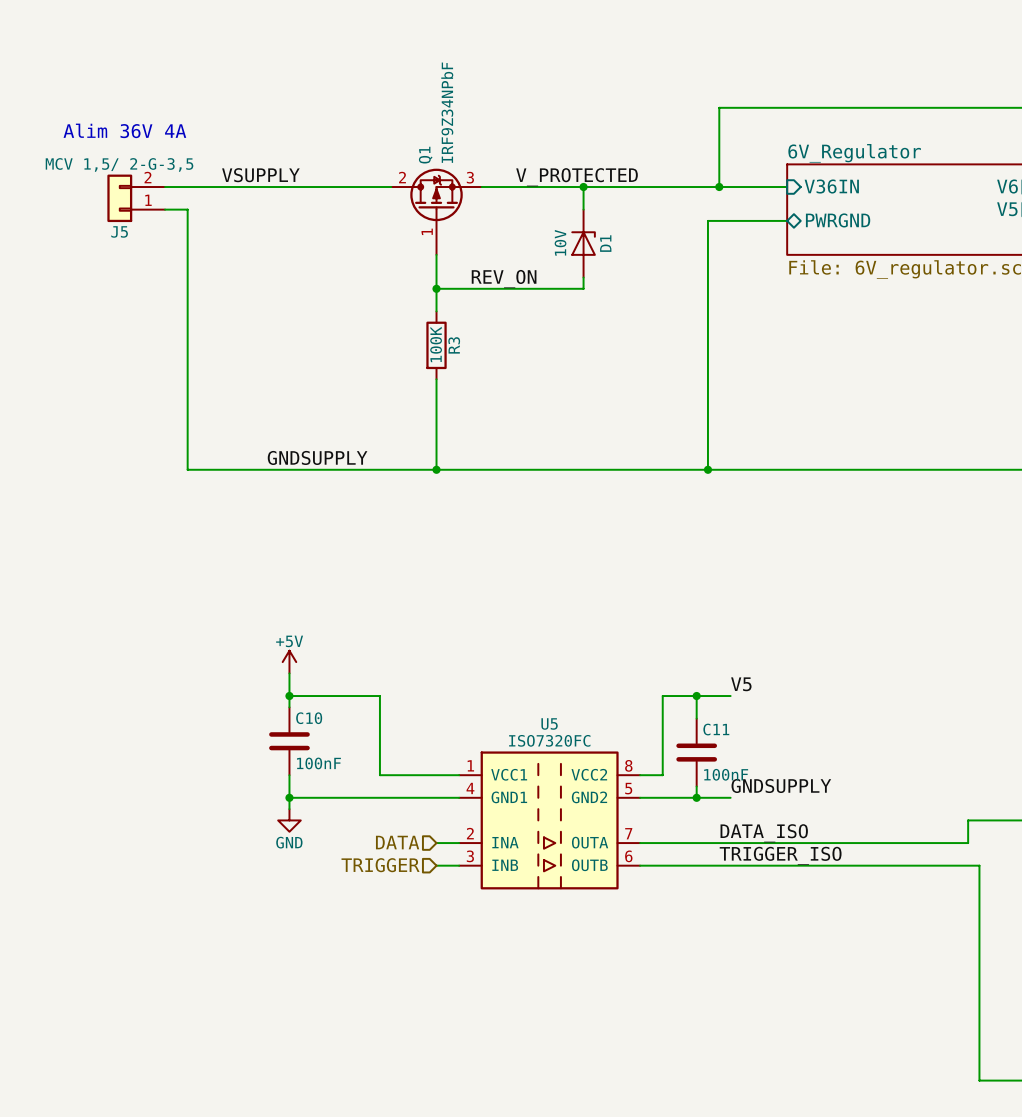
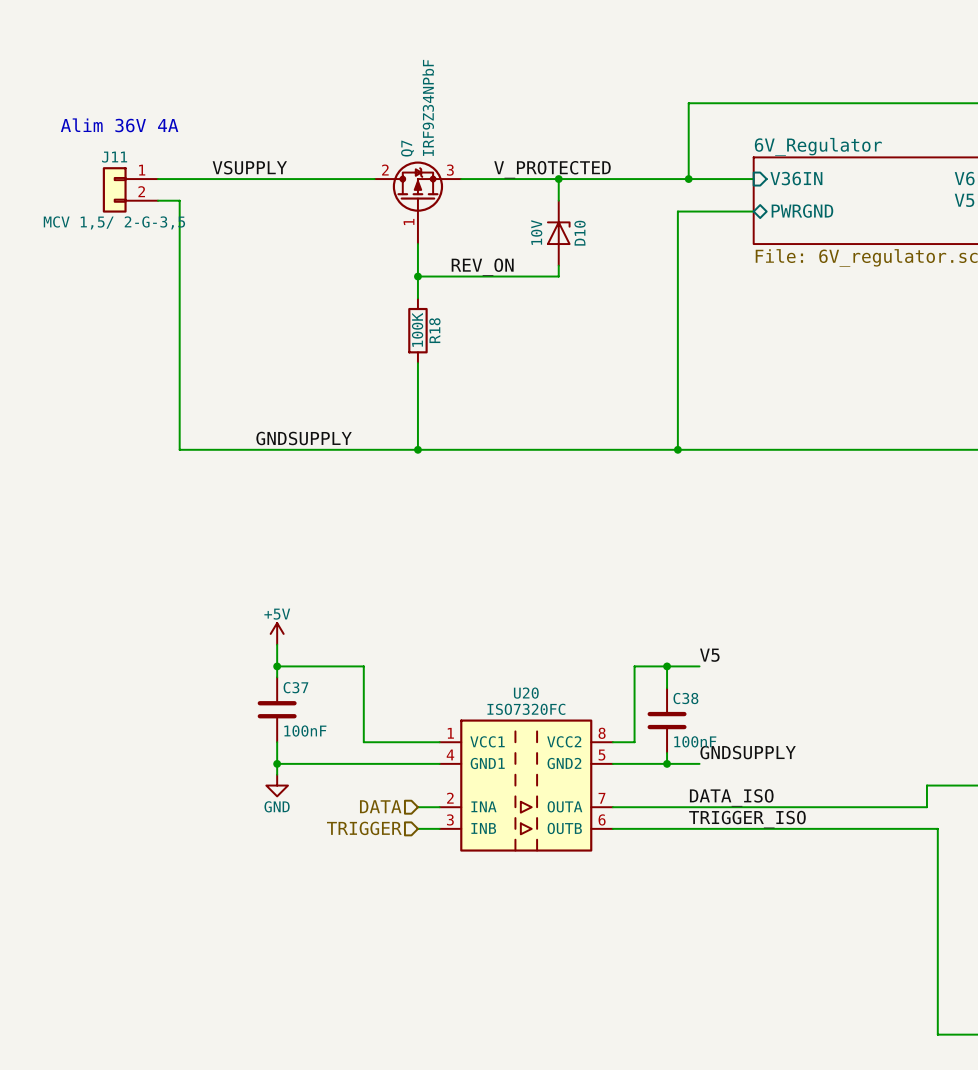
Q1 name: Q1 (425, 155) -> Q7 (407, 148)
J5 flip: as is (119, 198) -> up-down (114, 189)
J5 name: J5 (119, 231) -> J11 (114, 157)
D1 name: D1 (605, 243) -> D10 (580, 233)
R3 name: R3 (454, 345) -> R18 (434, 330)
C10 name: C10 (309, 718) -> C37 (295, 687)
U5 name: U5 (549, 723) -> U20 (526, 693)
C11 name: C11 (716, 729) -> C38 (685, 698)

